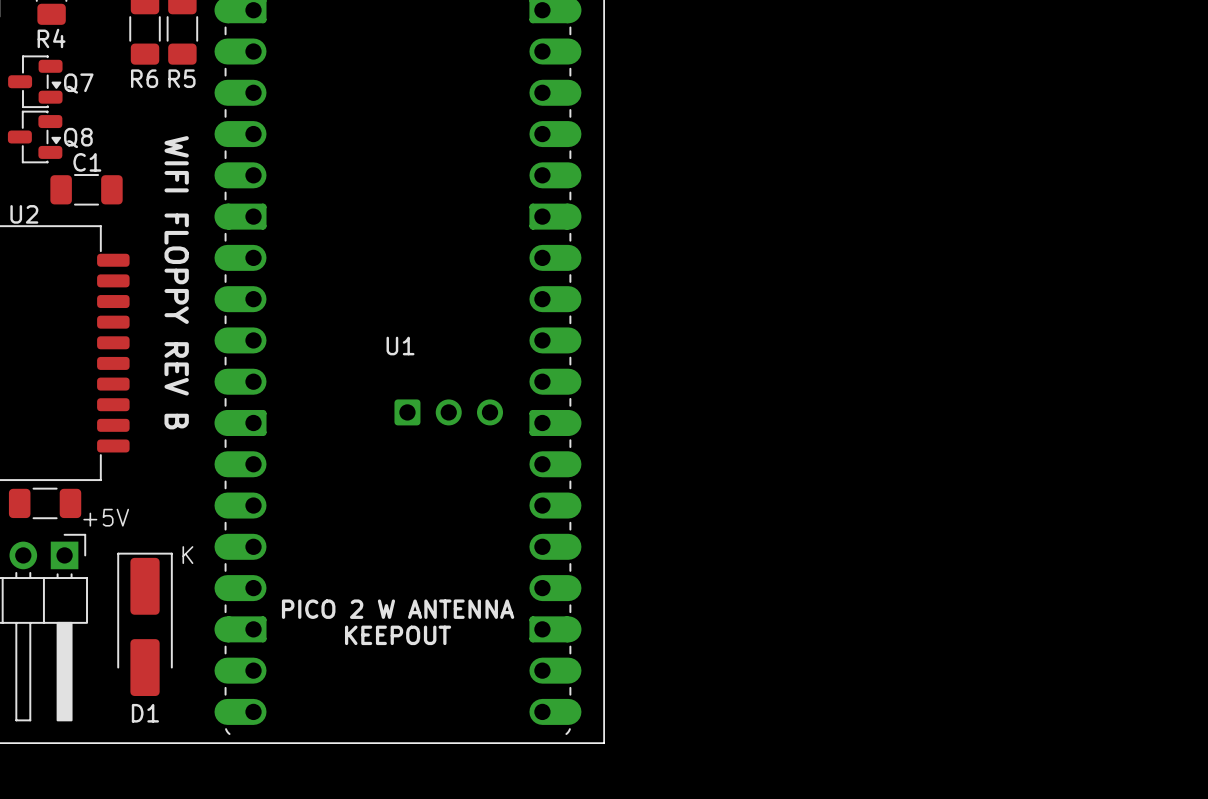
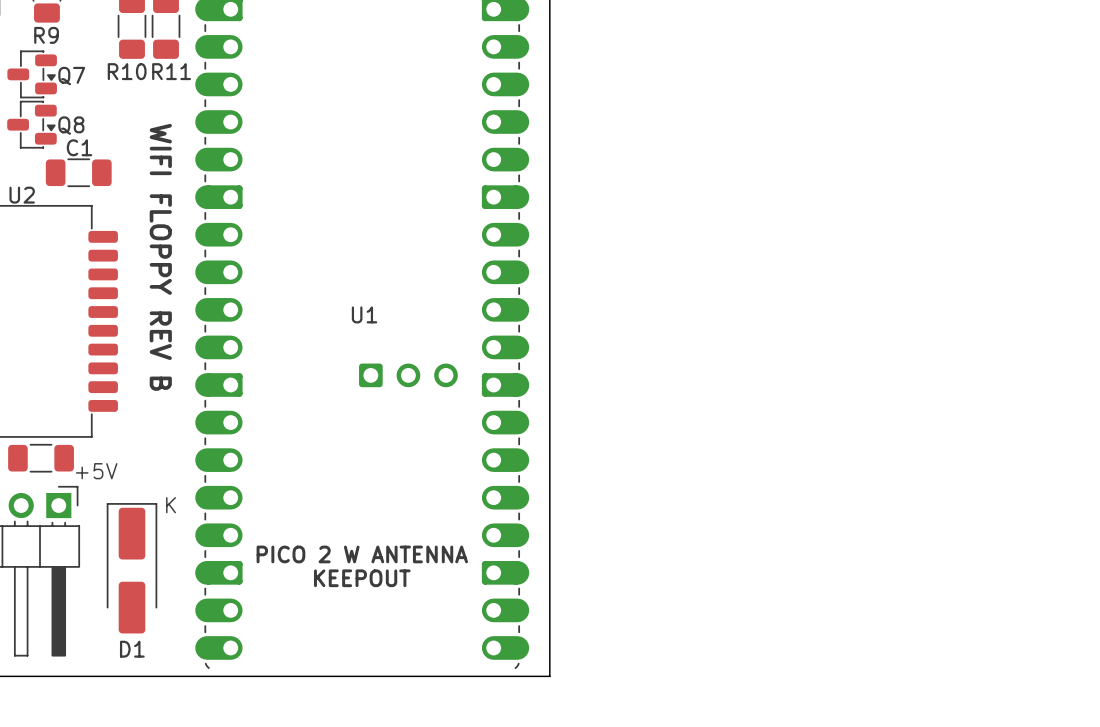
R4 name: R4 (51, 38) -> R9 (46, 35)
R6 name: R6 (144, 78) -> R10 (127, 71)
R5 name: R5 (181, 78) -> R11 (171, 71)

